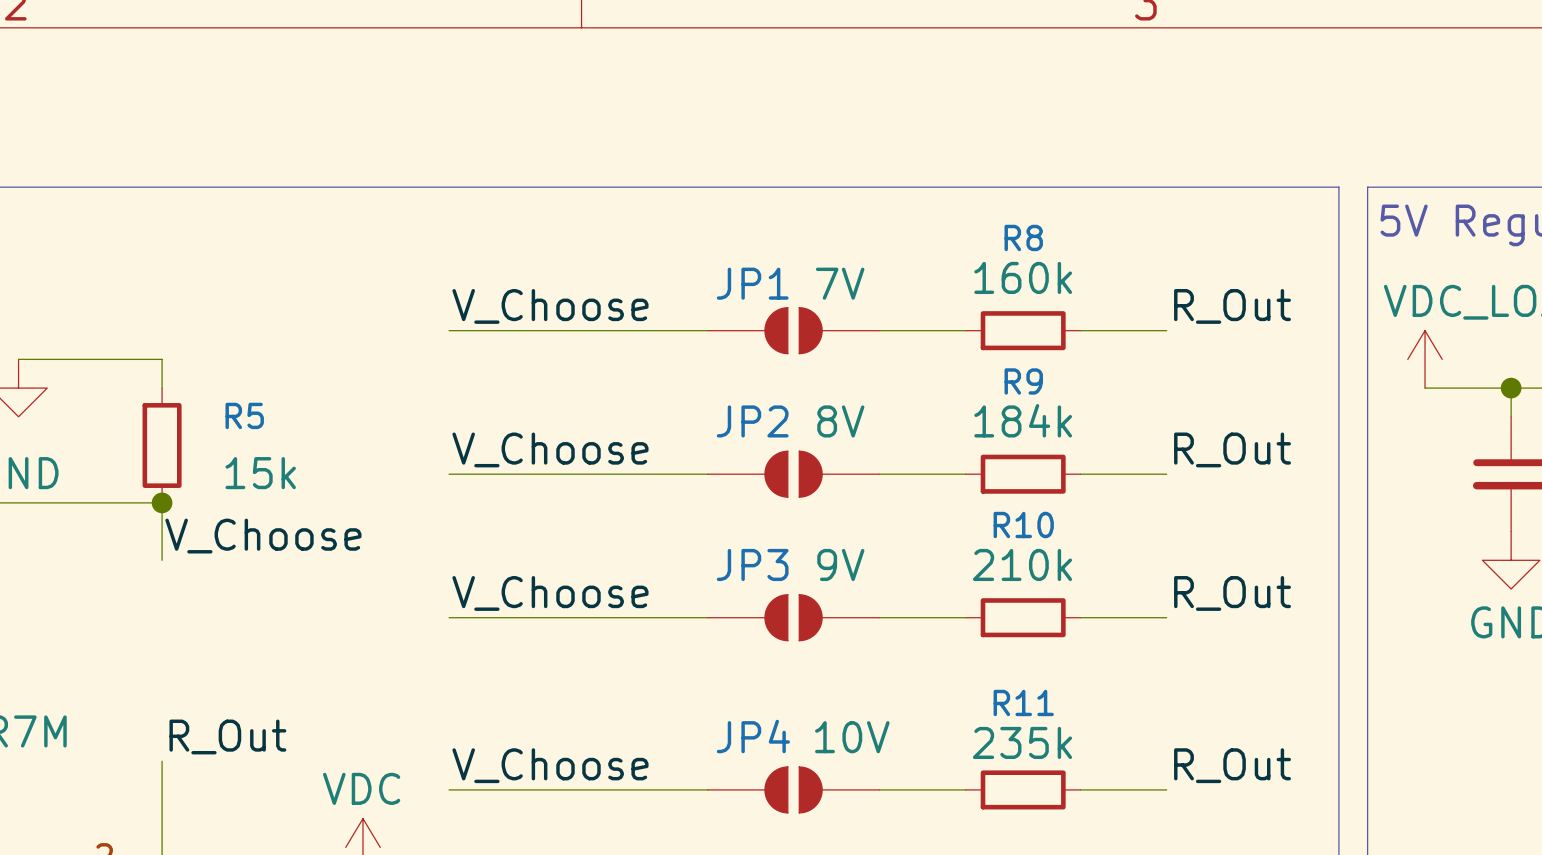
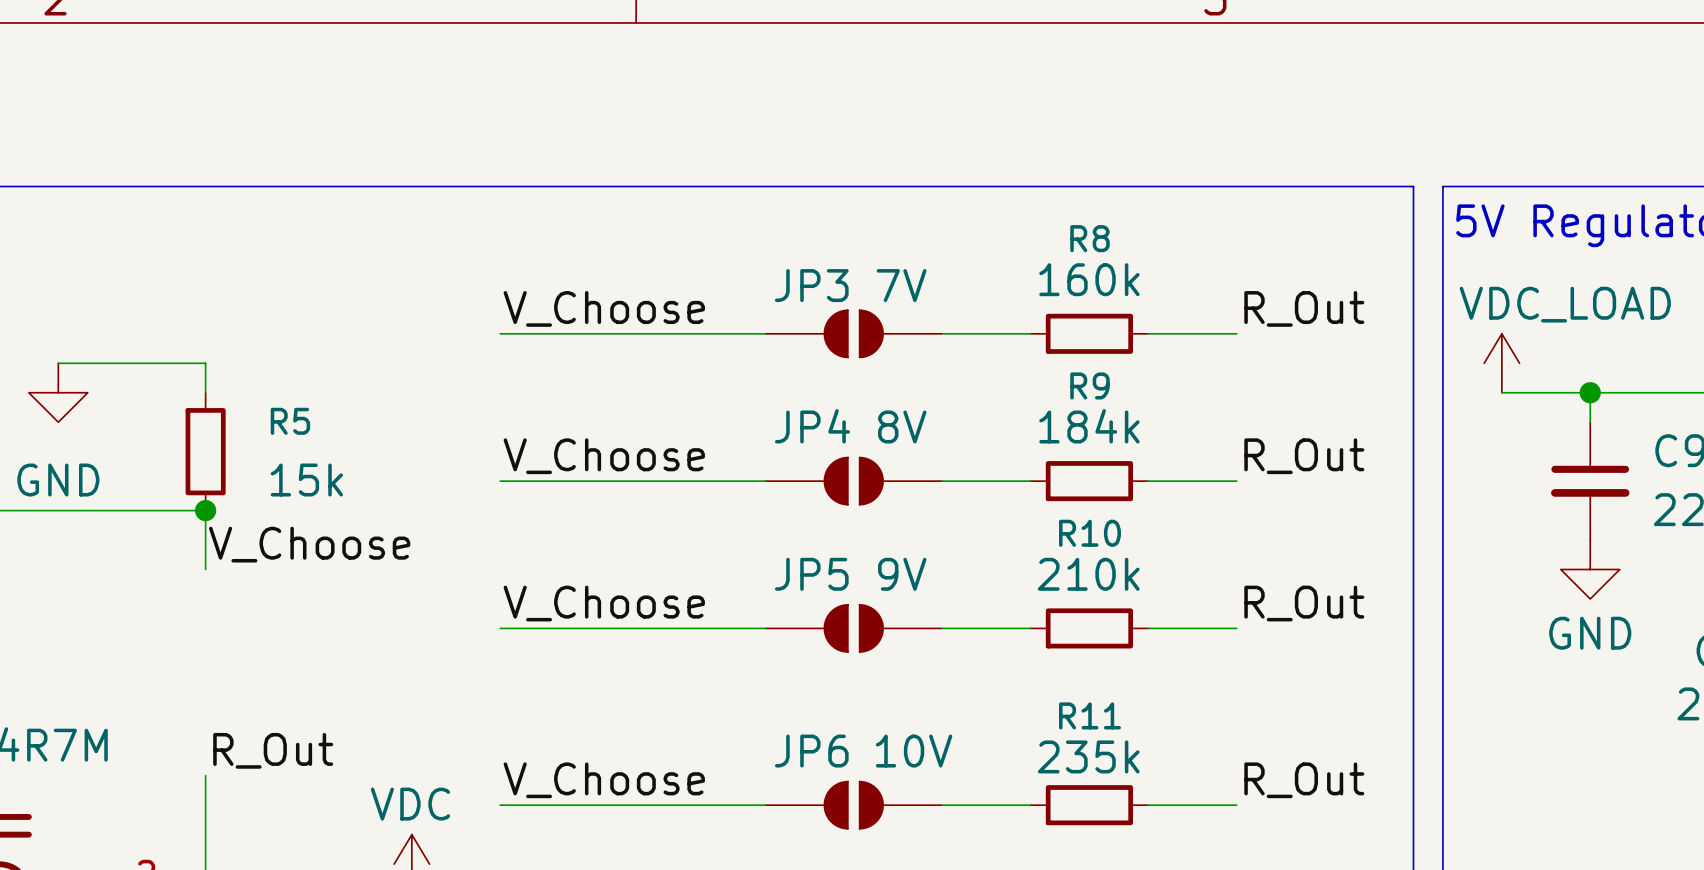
JP1 name: JP1 (752, 283) -> JP3 (811, 285)
JP2 name: JP2 (752, 421) -> JP4 (812, 426)
JP3 name: JP3 (752, 564) -> JP5 (811, 574)
JP4 name: JP4 (753, 736) -> JP6 (811, 751)

